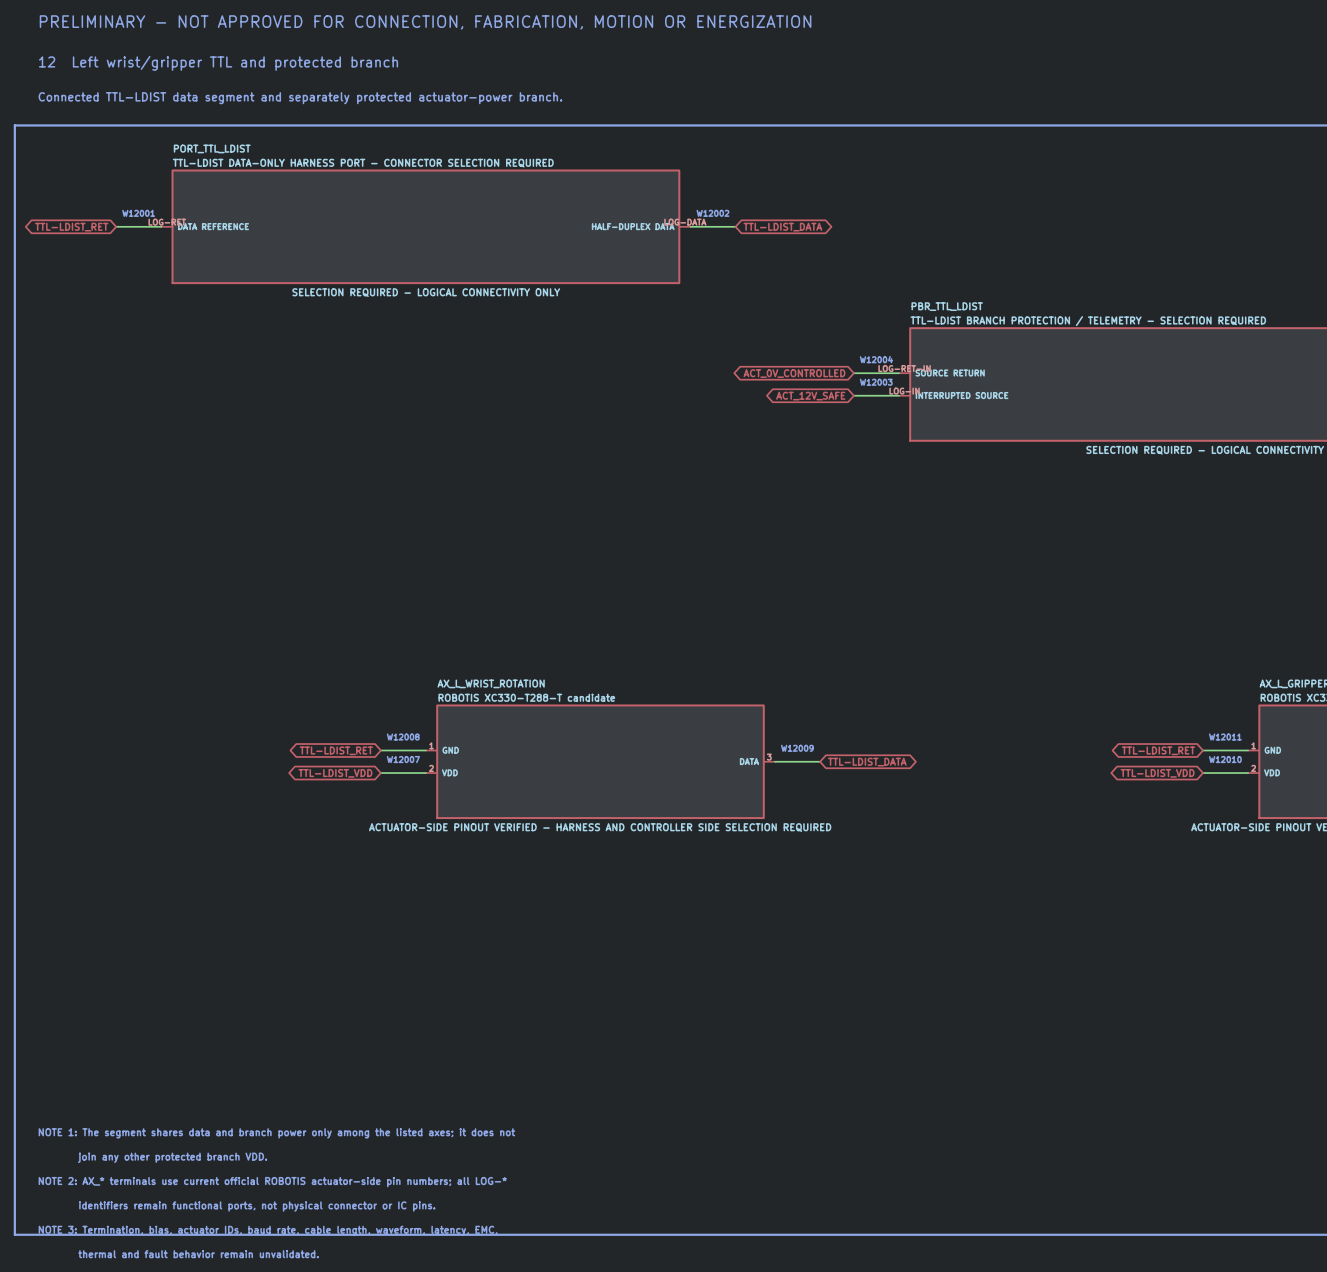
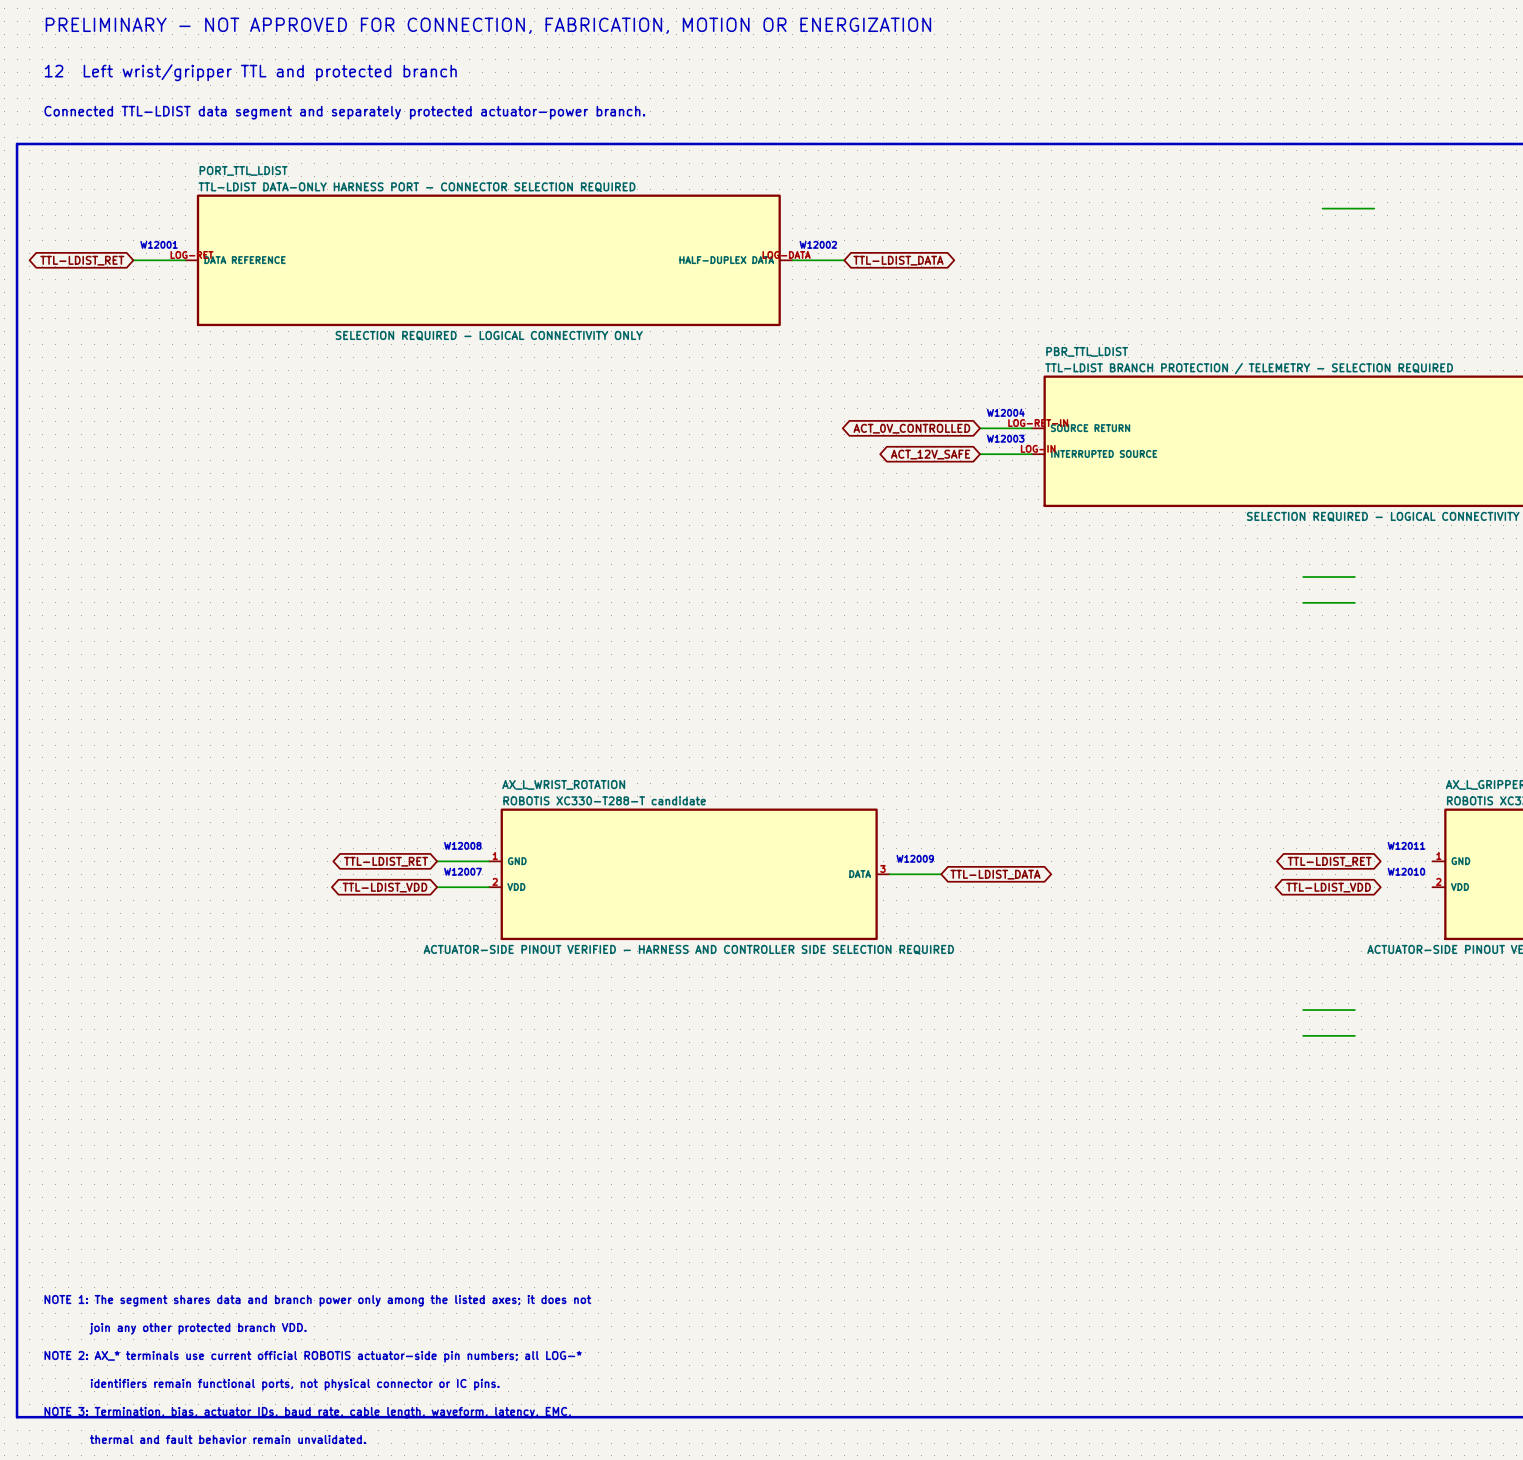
wire: none -> (1322, 208) (1374, 208)
wire: none -> (1303, 577) (1354, 577)
wire: none -> (1303, 602) (1354, 602)
wire: (1203, 750) (1248, 750) -> none
wire: (1203, 773) (1248, 773) -> none
wire: none -> (1303, 1010) (1354, 1010)
wire: none -> (1303, 1035) (1354, 1035)

